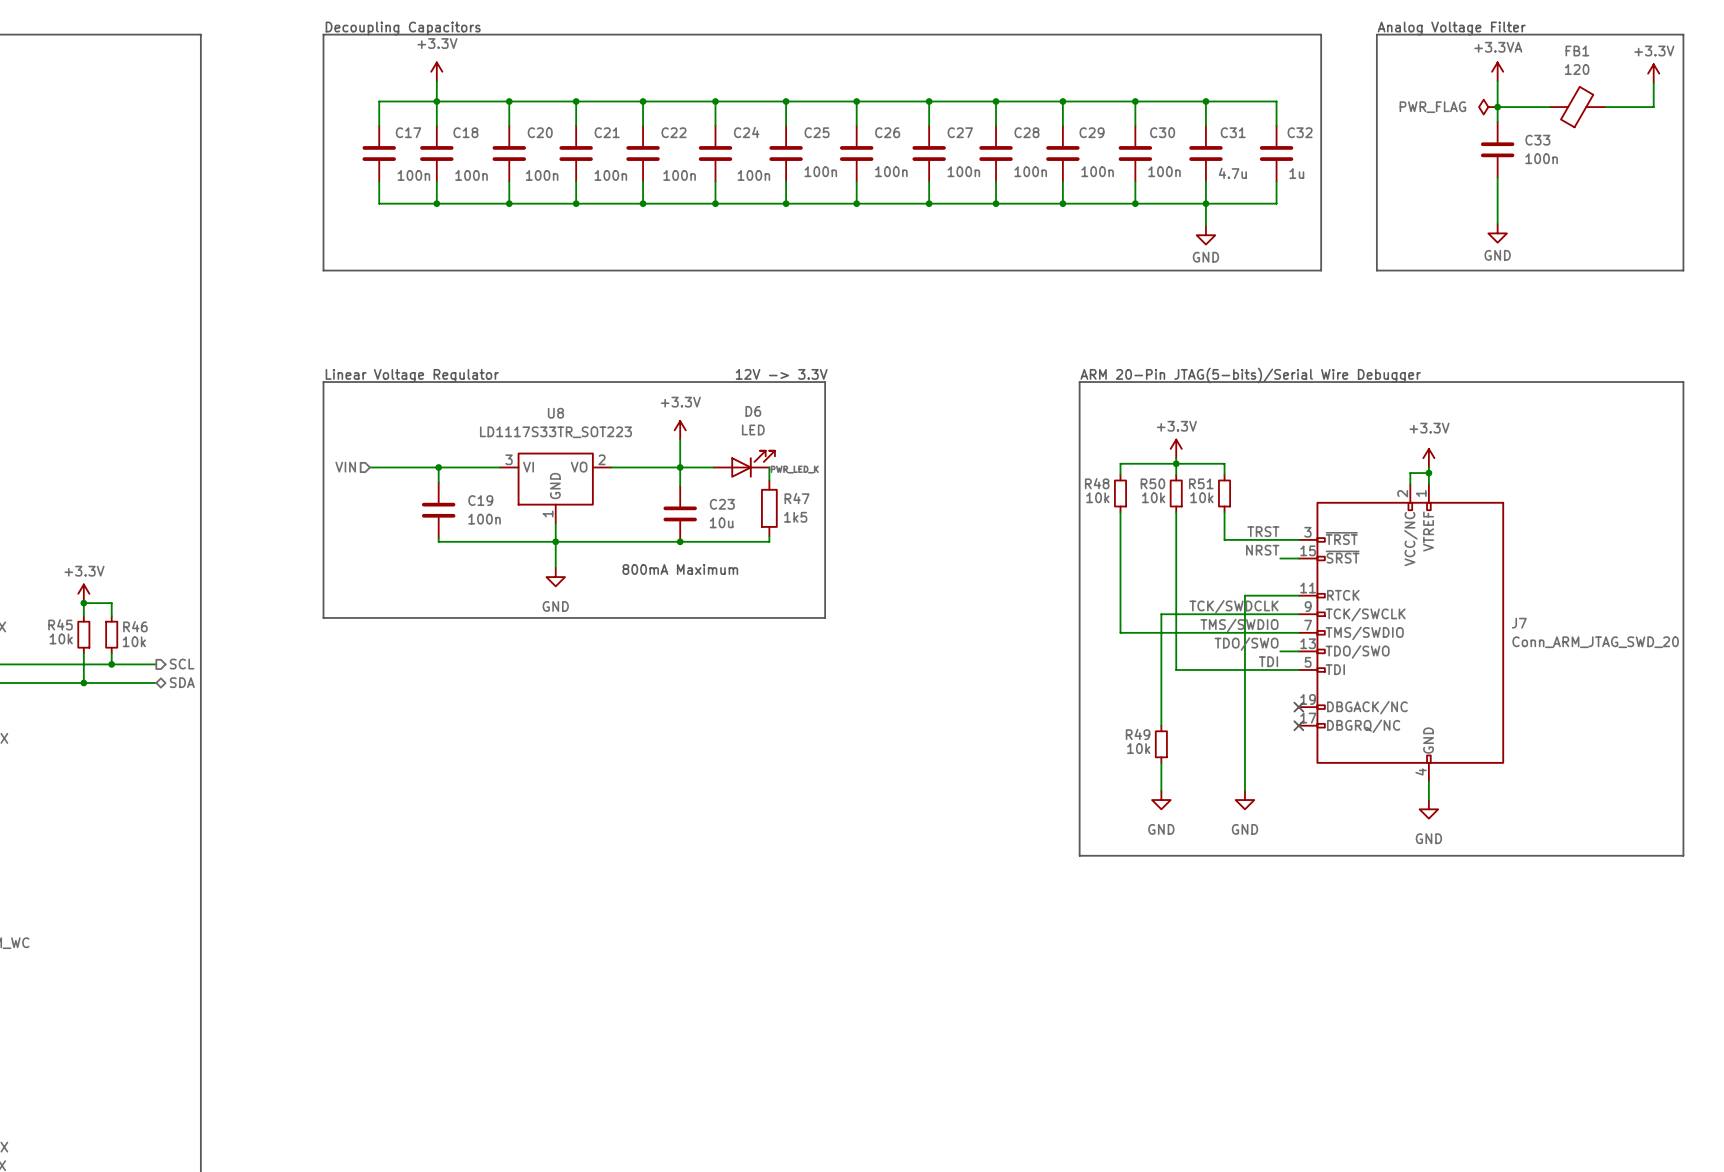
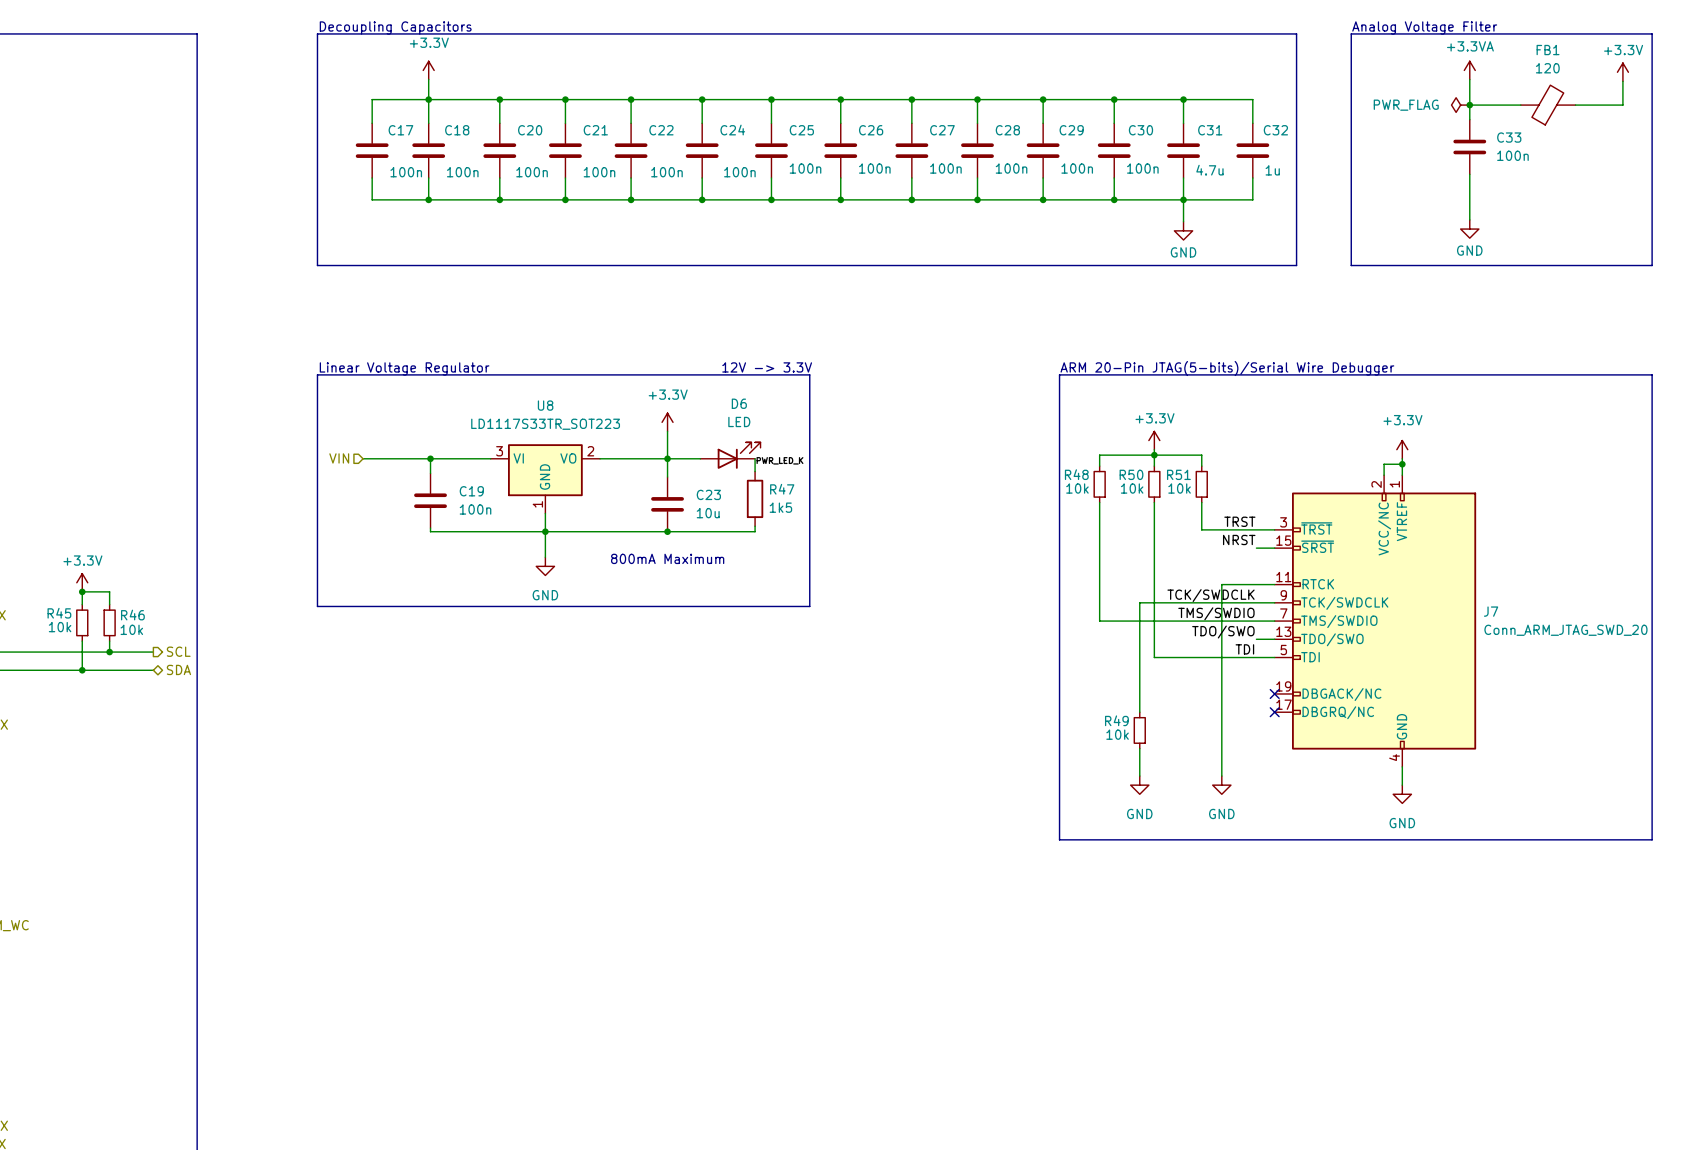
J7 pin name: TCK/SWCLK (1365, 614) -> TCK/SWDCLK (1344, 603)

